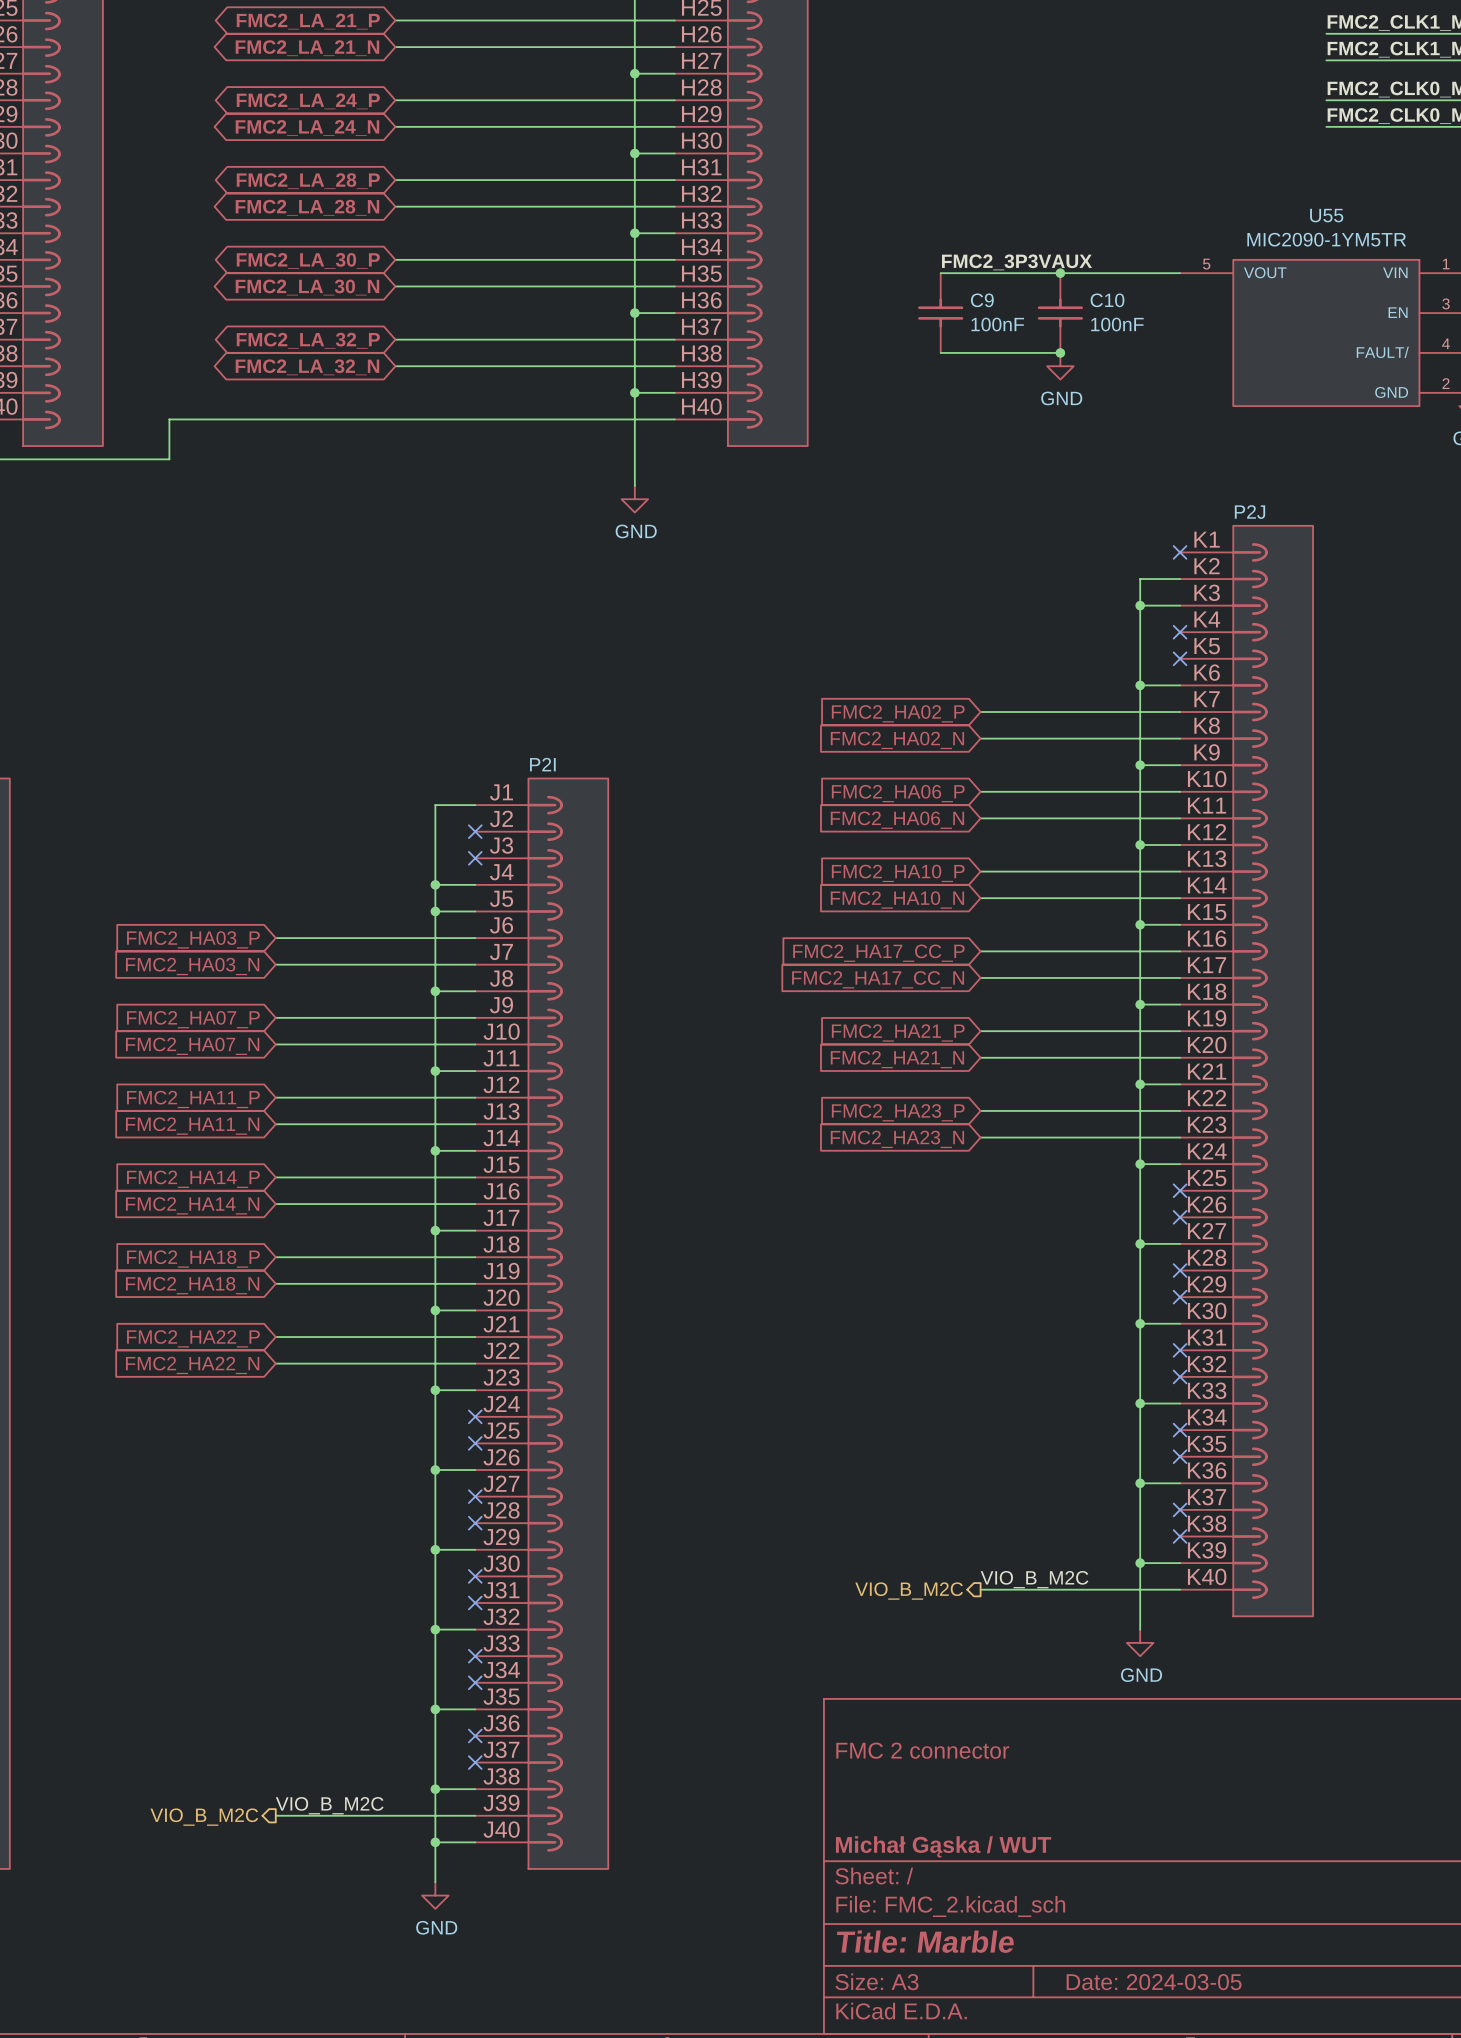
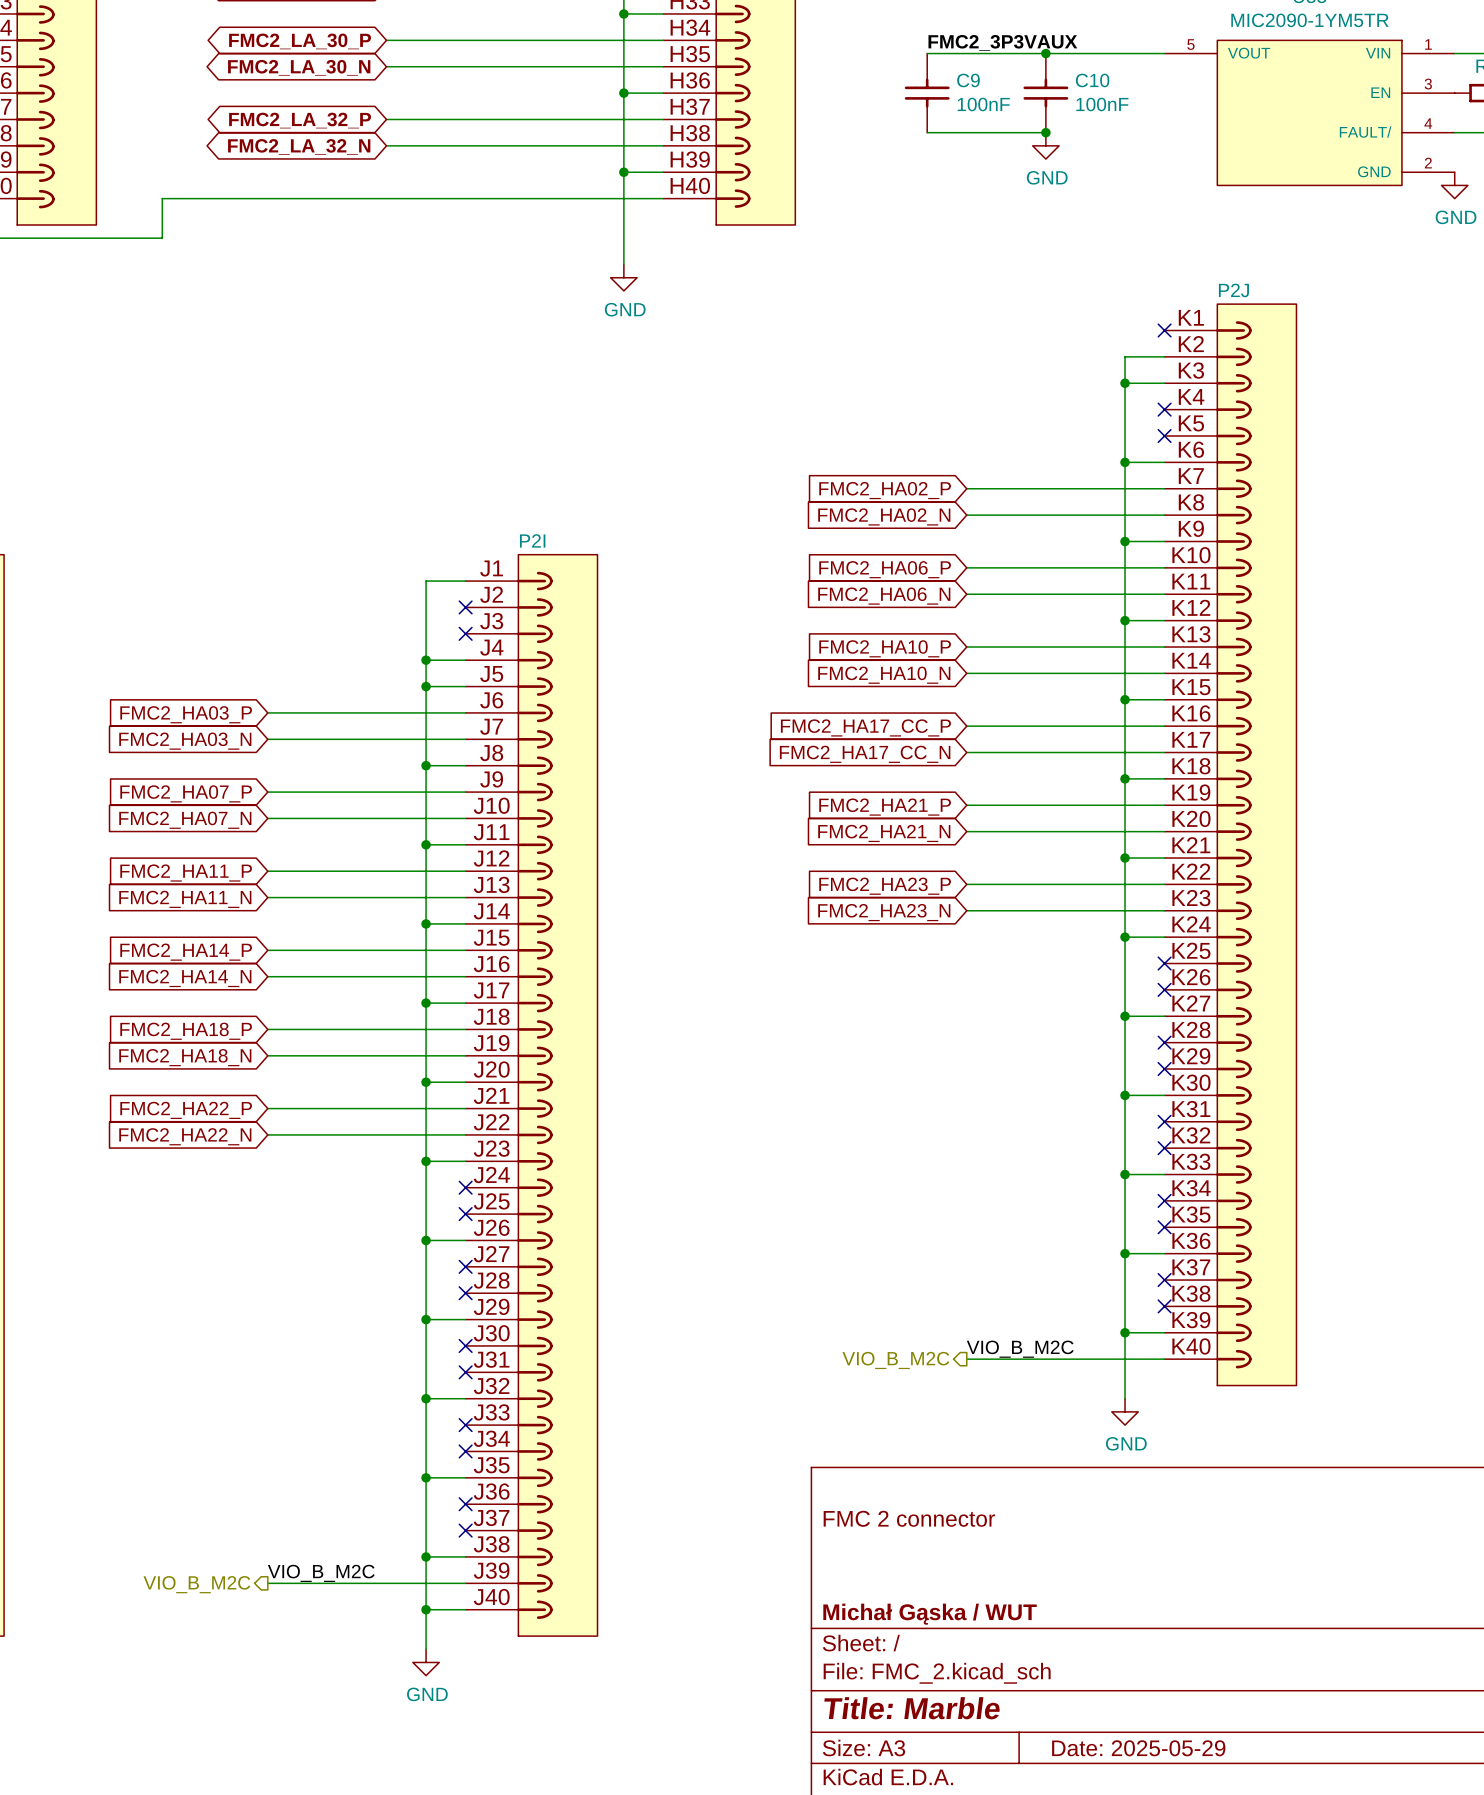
title block: Date: 2024-03-05 (1154, 1982) -> Date: 2025-05-29 (1138, 1748)

